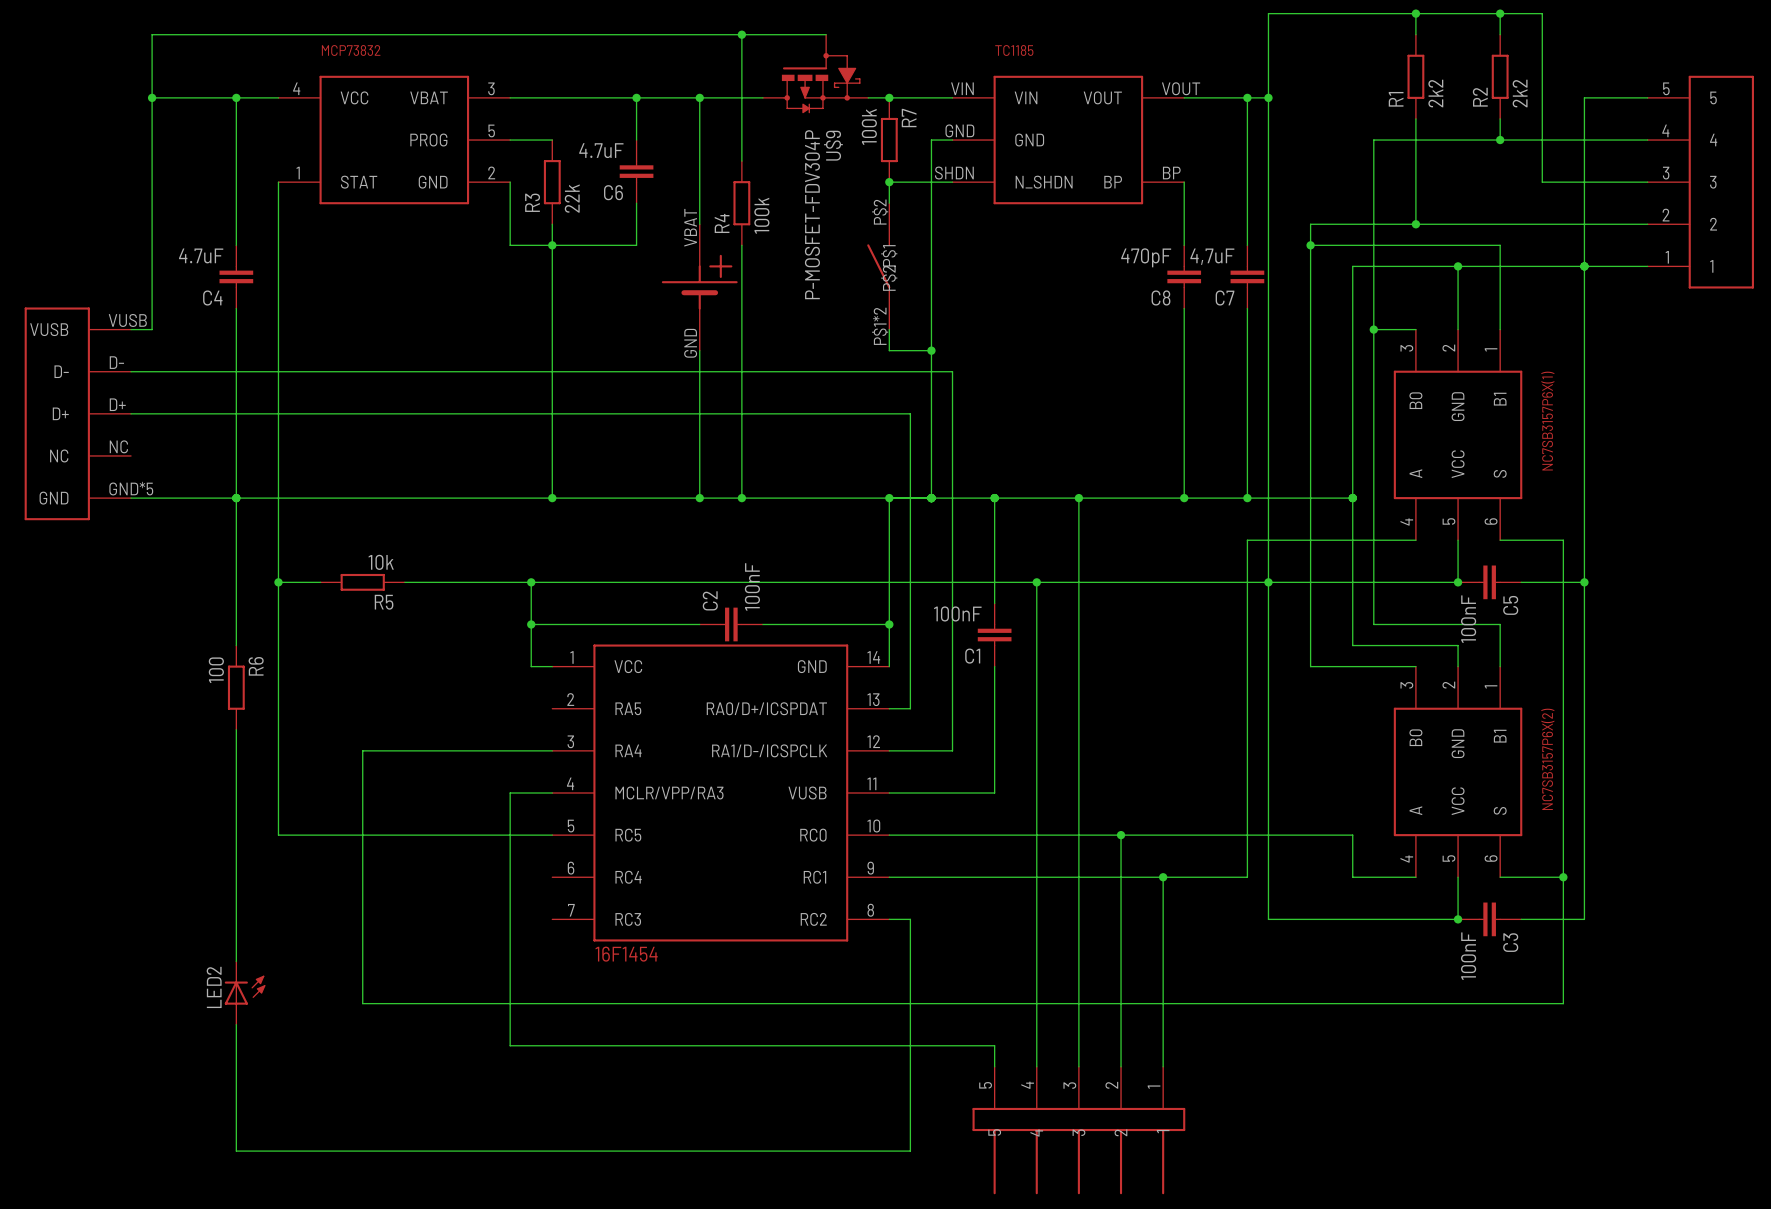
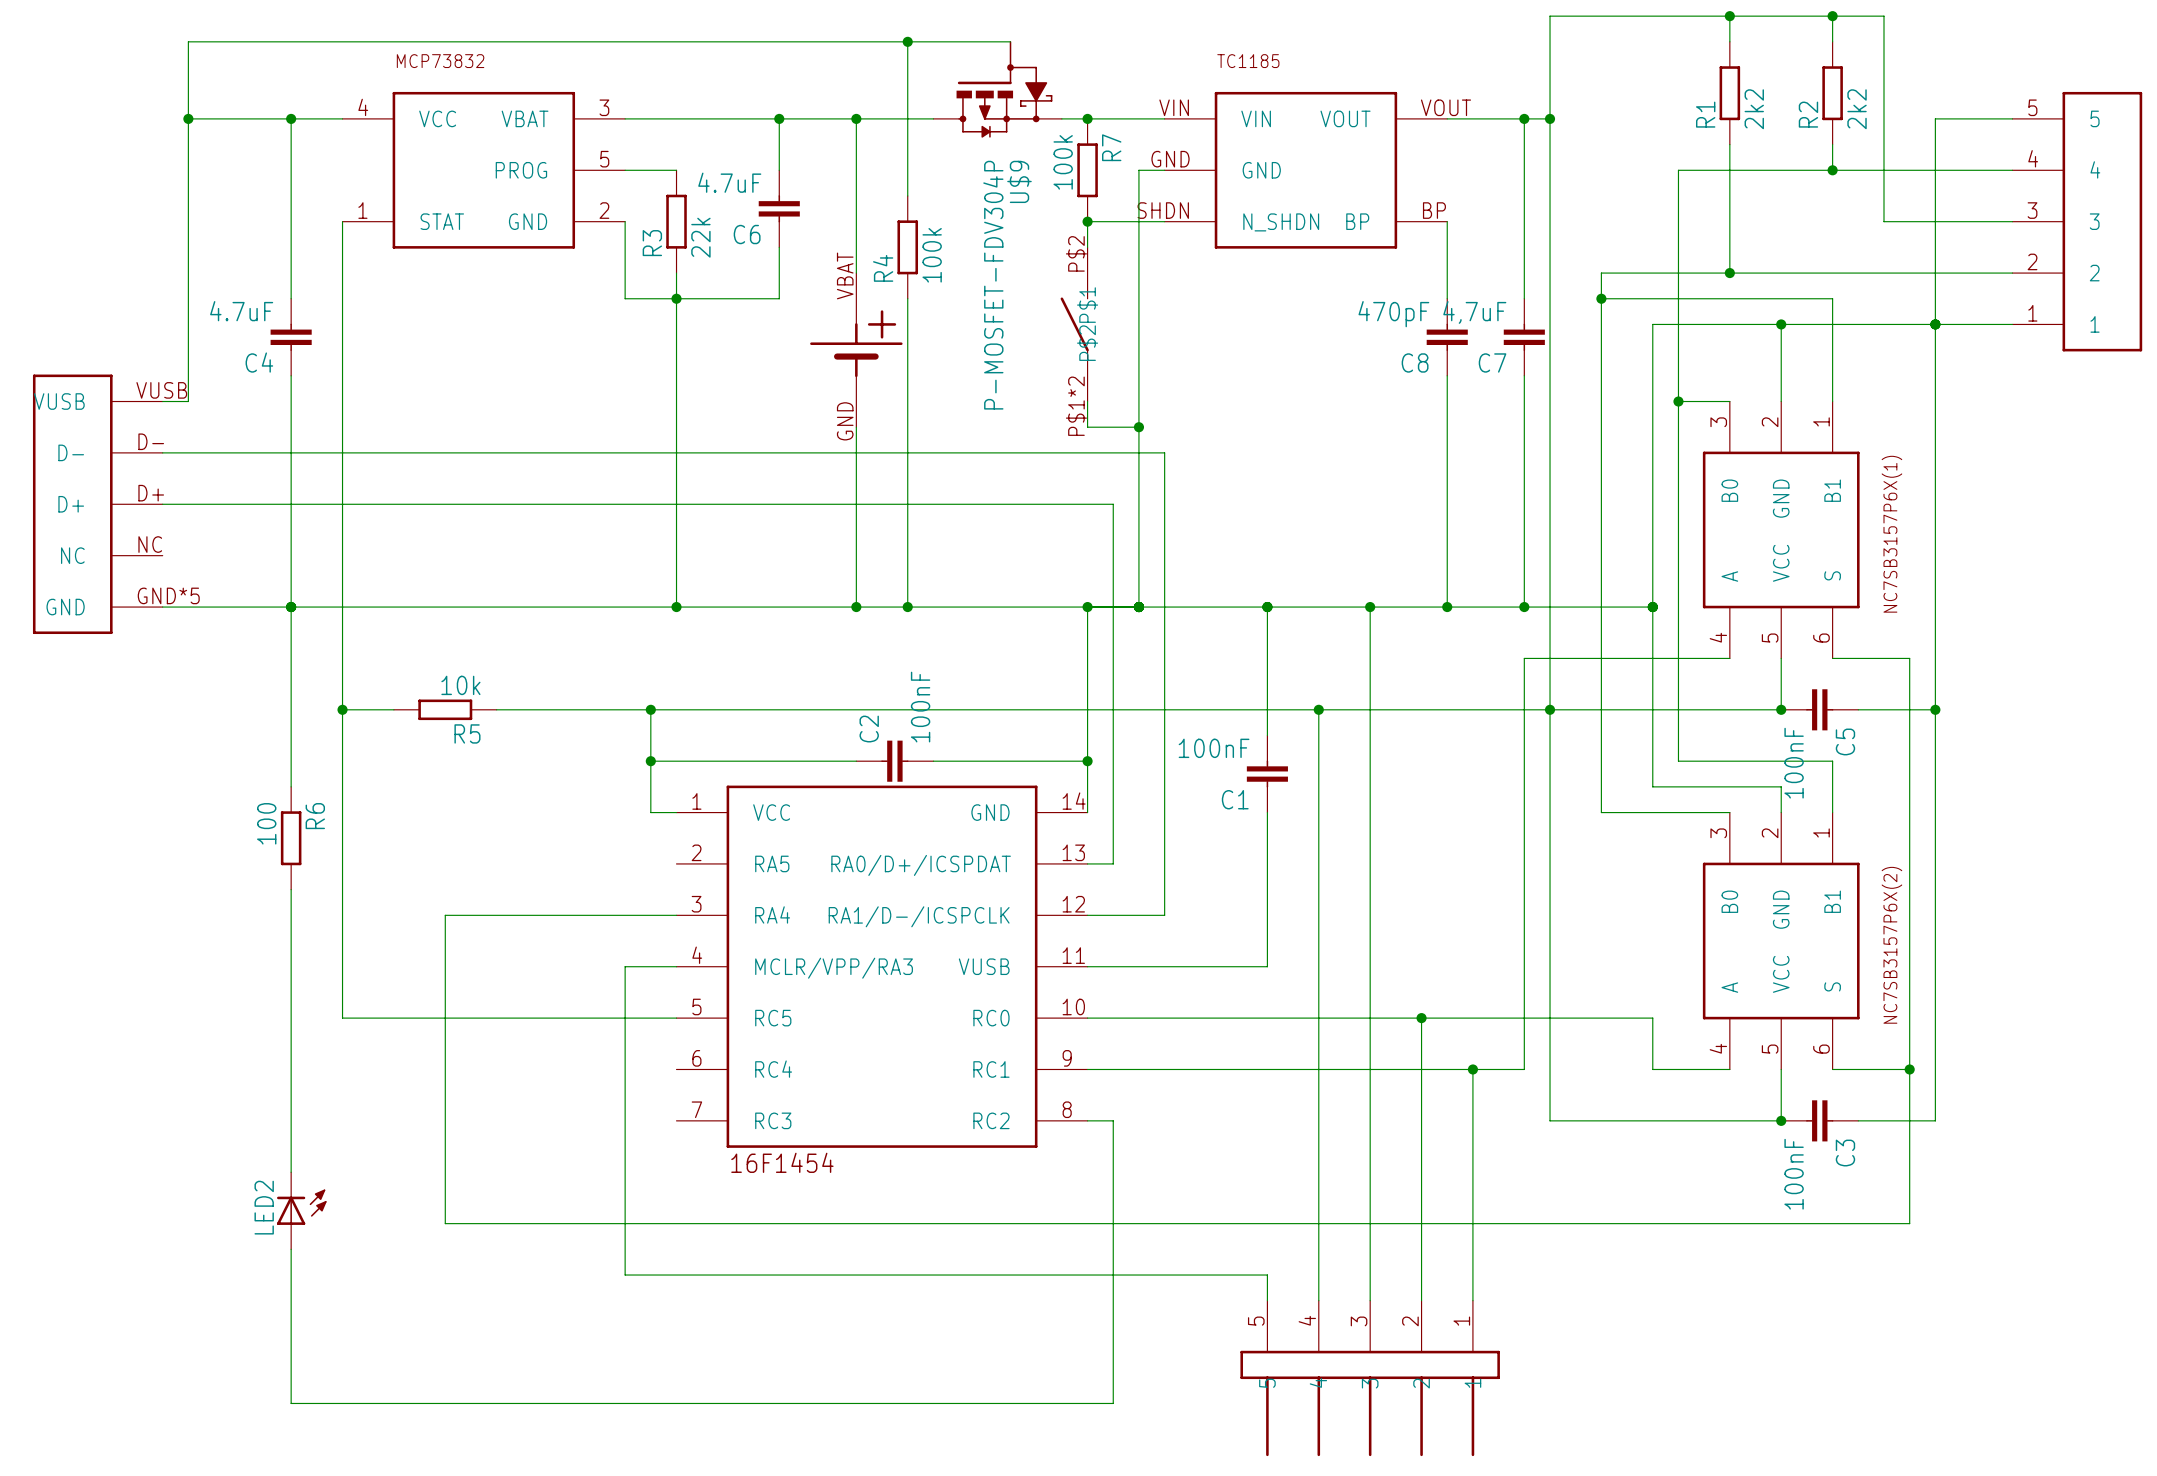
wire: (994, 498) (994, 603) -> none
junction: (994, 498) -> none
junction: none -> (1267, 607)
wire: (1078, 498) (1078, 582) -> (1267, 607) (1267, 709)
junction: (1078, 498) -> none
wire: none -> (1370, 607) (1370, 1018)
junction: none -> (1370, 607)
junction: (1036, 582) -> none
junction: none -> (1318, 709)
C1 position: (994, 635) -> (1267, 774)
wire: (994, 666) (994, 793) -> (1267, 966) (1216, 966)
wire: (1036, 793) (1036, 1045) -> none
junction: (1121, 835) -> none
wire: none -> (1421, 1018) (1421, 1069)
junction: none -> (1421, 1018)
junction: (1163, 877) -> none
wire: none -> (1472, 1069) (1472, 1300)
junction: none -> (1472, 1069)
wire: (994, 1045) (994, 1066) -> (1216, 1275) (1267, 1275)
part position: (1078, 1130) -> (1370, 1378)

